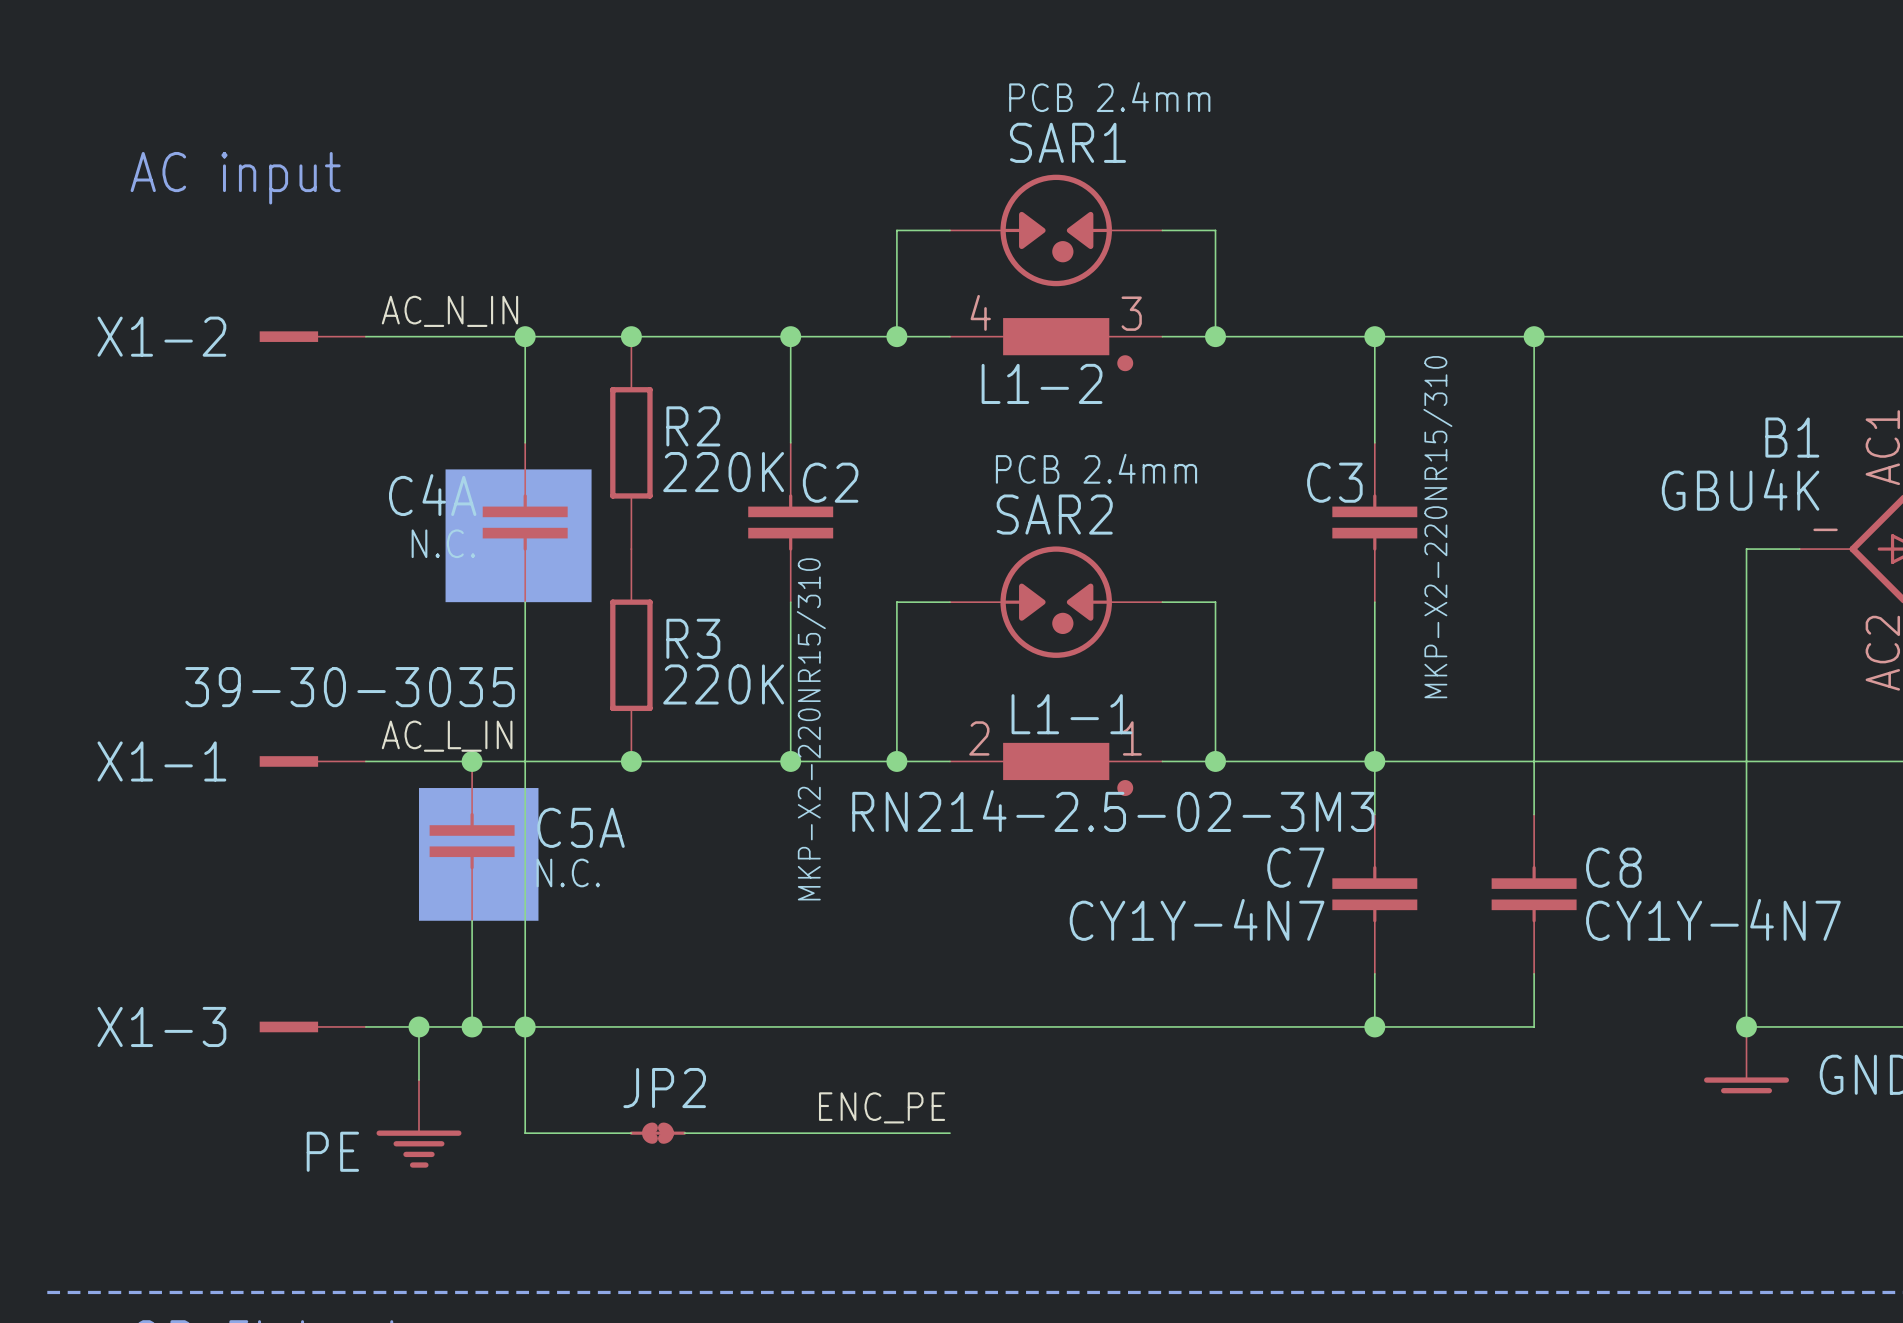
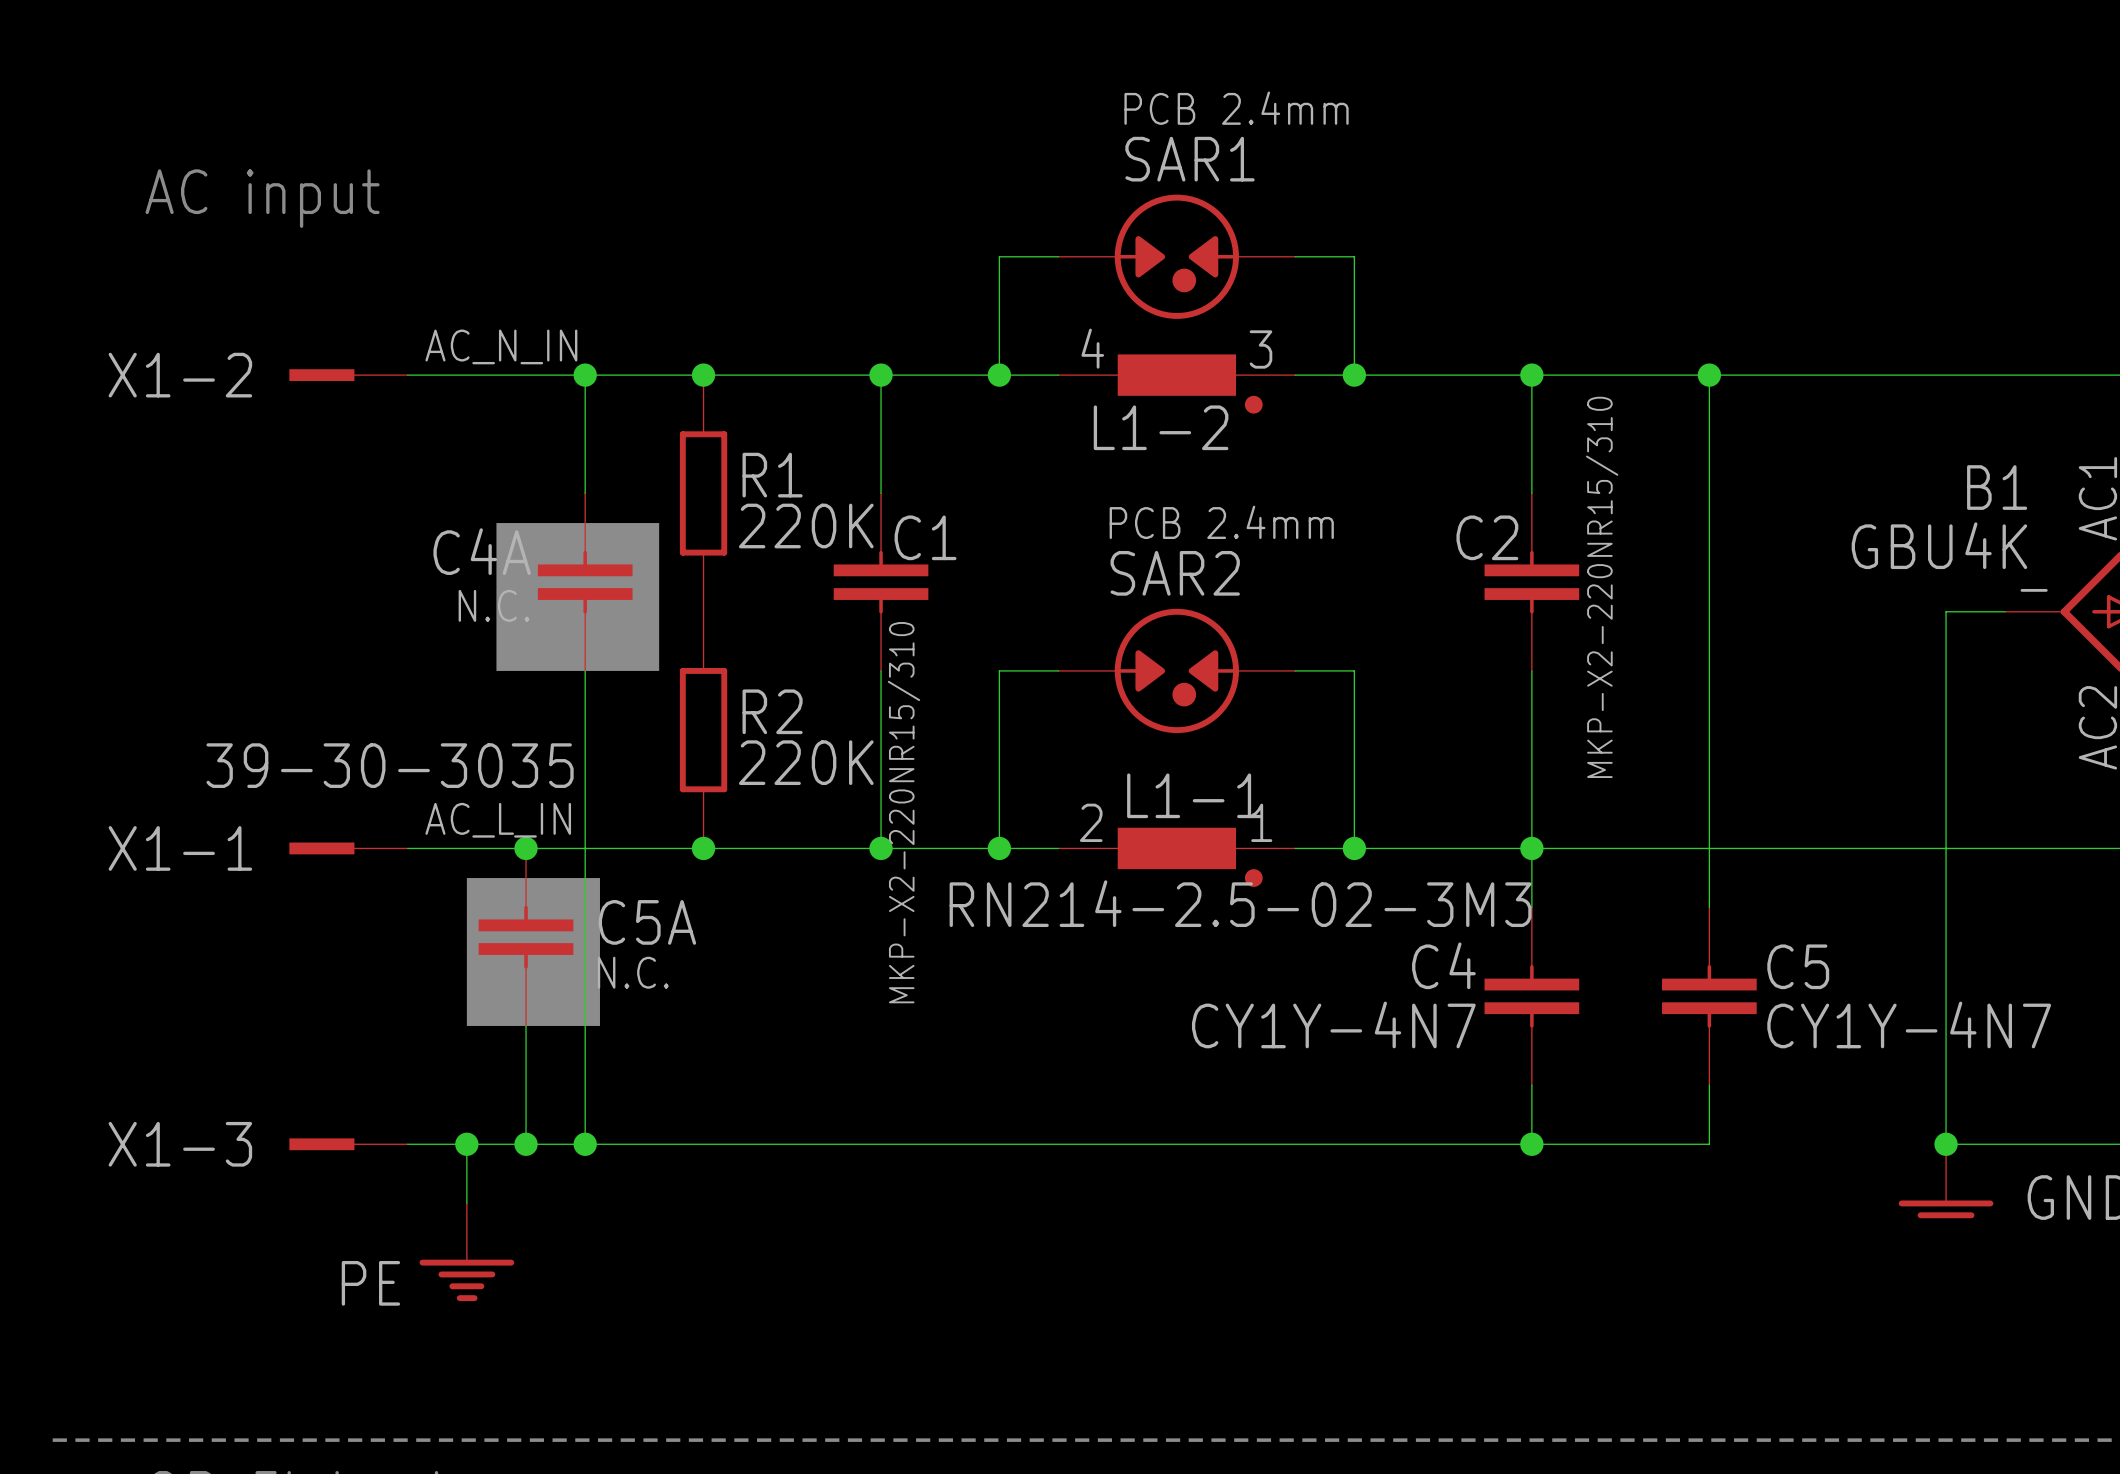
R2 name: R2 (693, 426) -> R1 (772, 475)
C2 name: C2 (830, 482) -> C1 (925, 537)
C3 name: C3 (1334, 482) -> C2 (1487, 537)
R3 name: R3 (693, 638) -> R2 (772, 711)
C7 name: C7 (1295, 867) -> C4 (1443, 965)
C8 name: C8 (1613, 867) -> C5 (1798, 966)
wire: (525, 1026) (525, 1133) (631, 1133) -> none
label: ENC_PE (882, 1107) -> none
JP2: (657, 1133) -> none
wire: (684, 1133) (950, 1133) -> none

